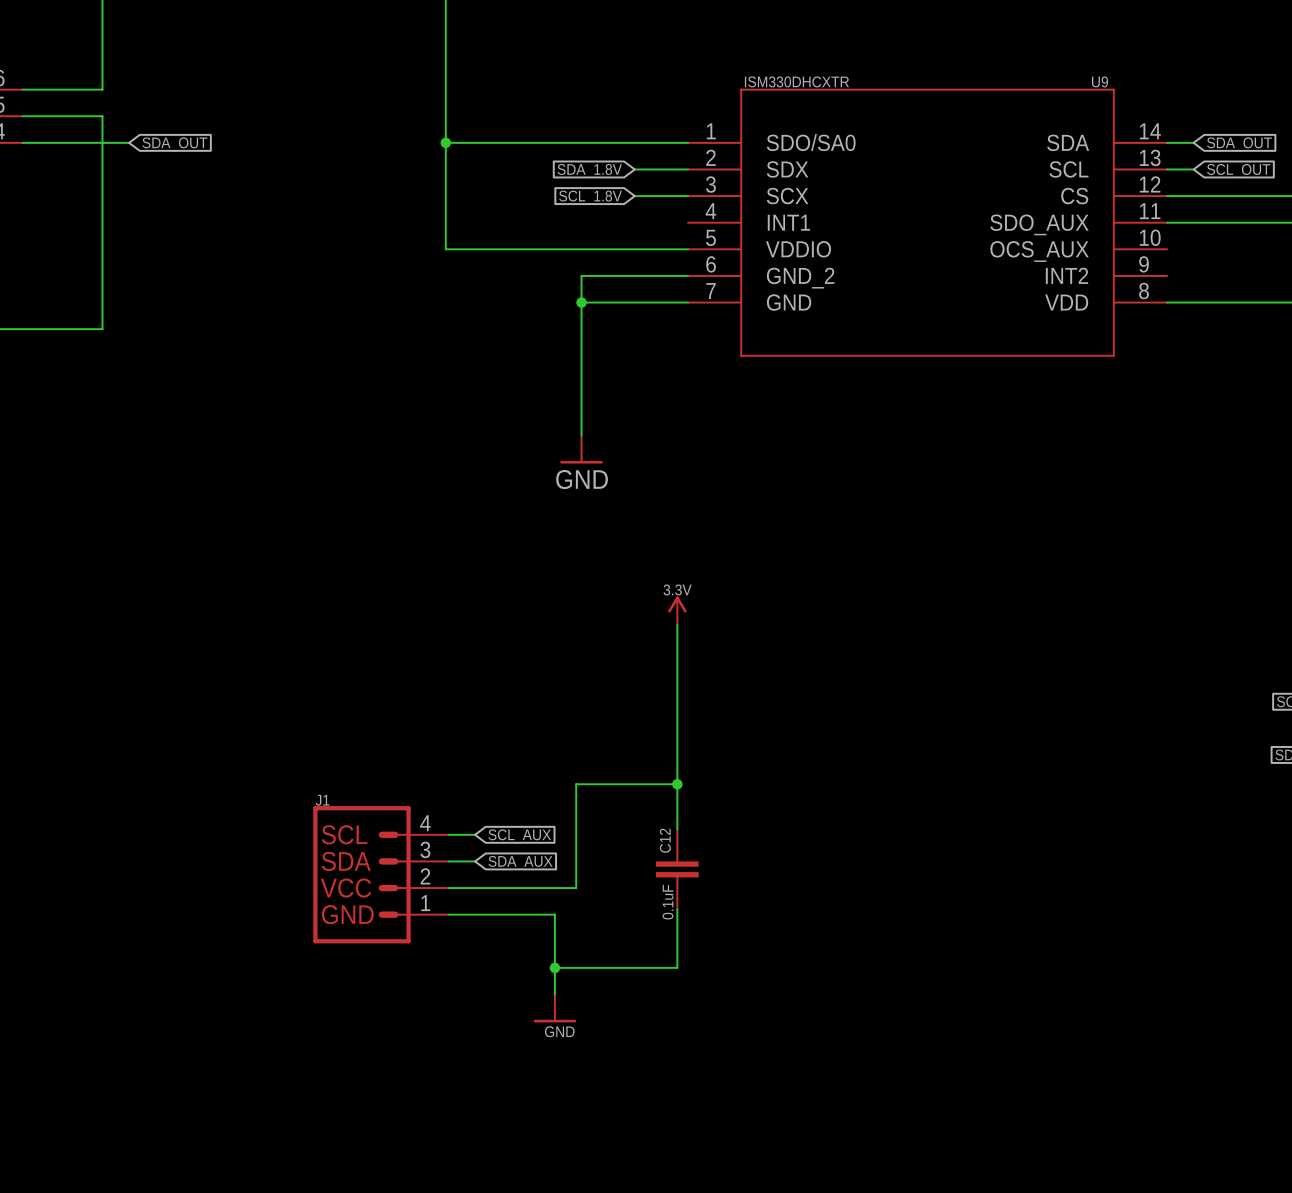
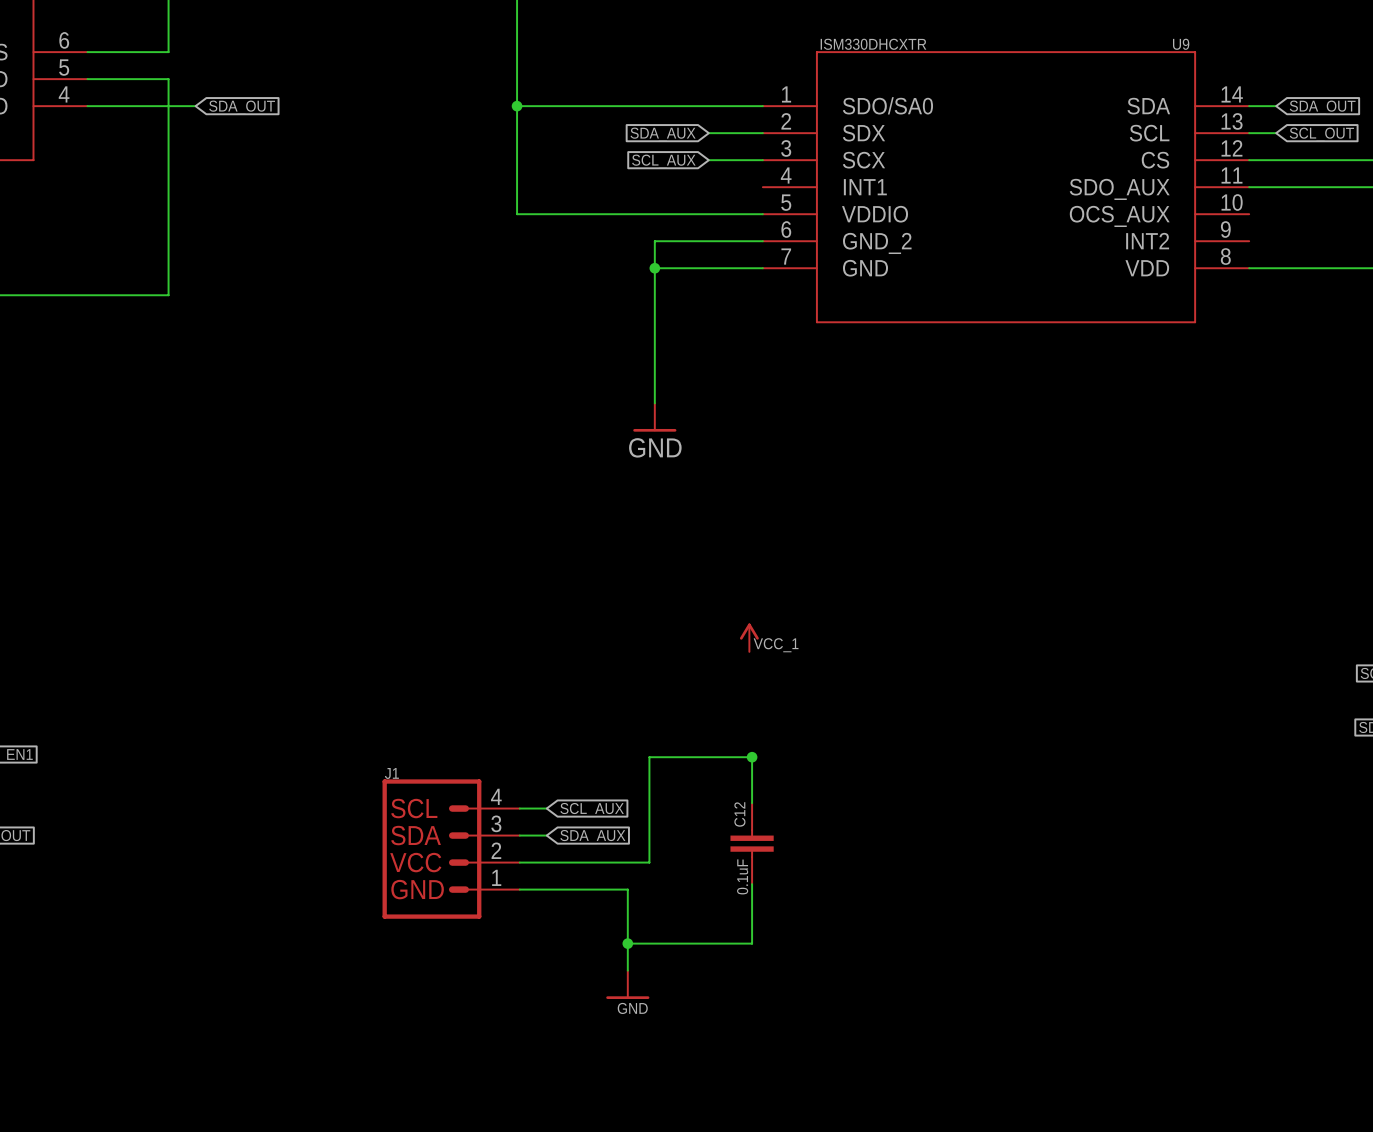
global label: SDA_1.8V (589, 170) -> SDA_AUX (663, 134)
global label: SCL_1.8V (590, 197) -> SCL_AUX (663, 161)
power symbol: 3.3V (677, 610) -> none
wire: (677, 624) (677, 784) -> none
power symbol: none -> VCC_1 (749, 637)

